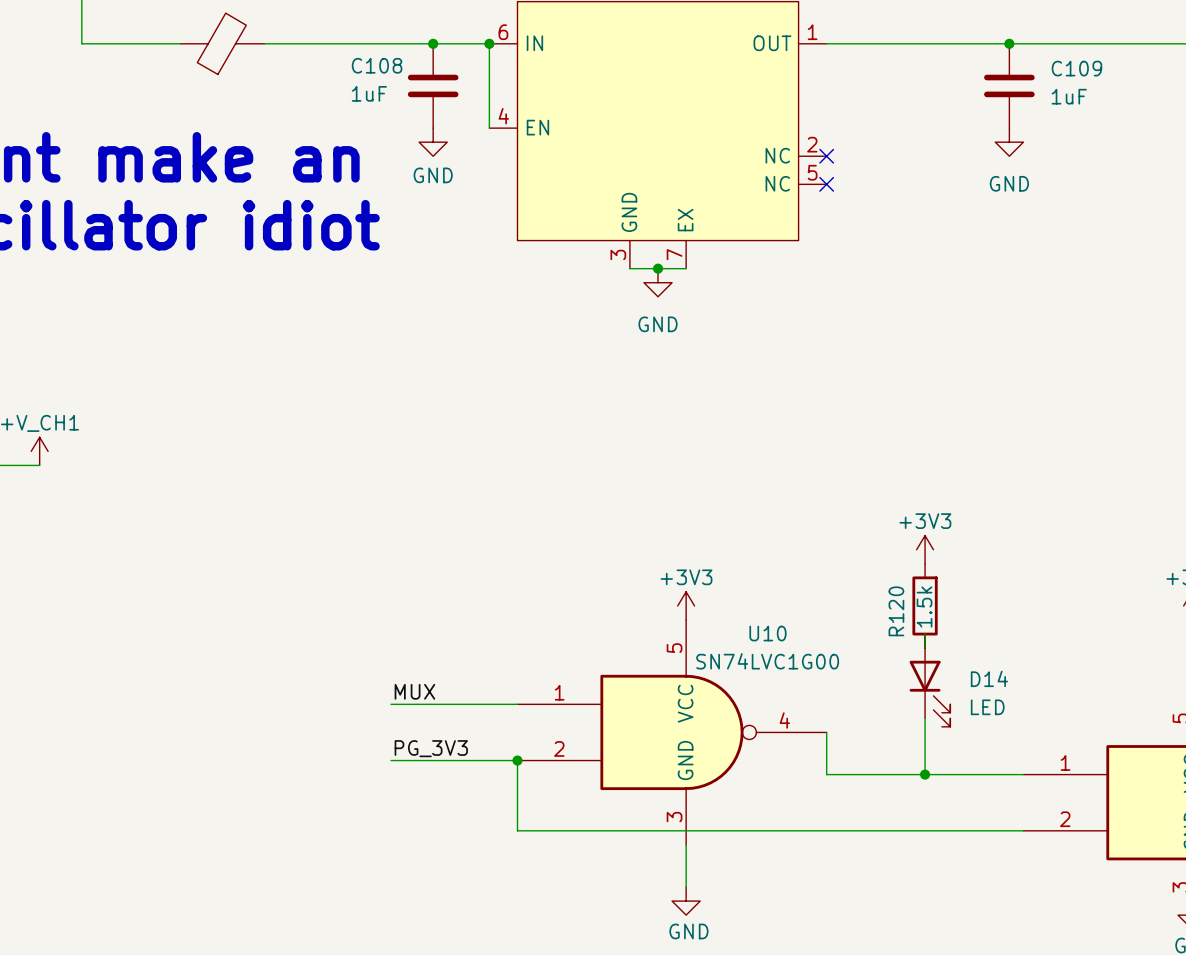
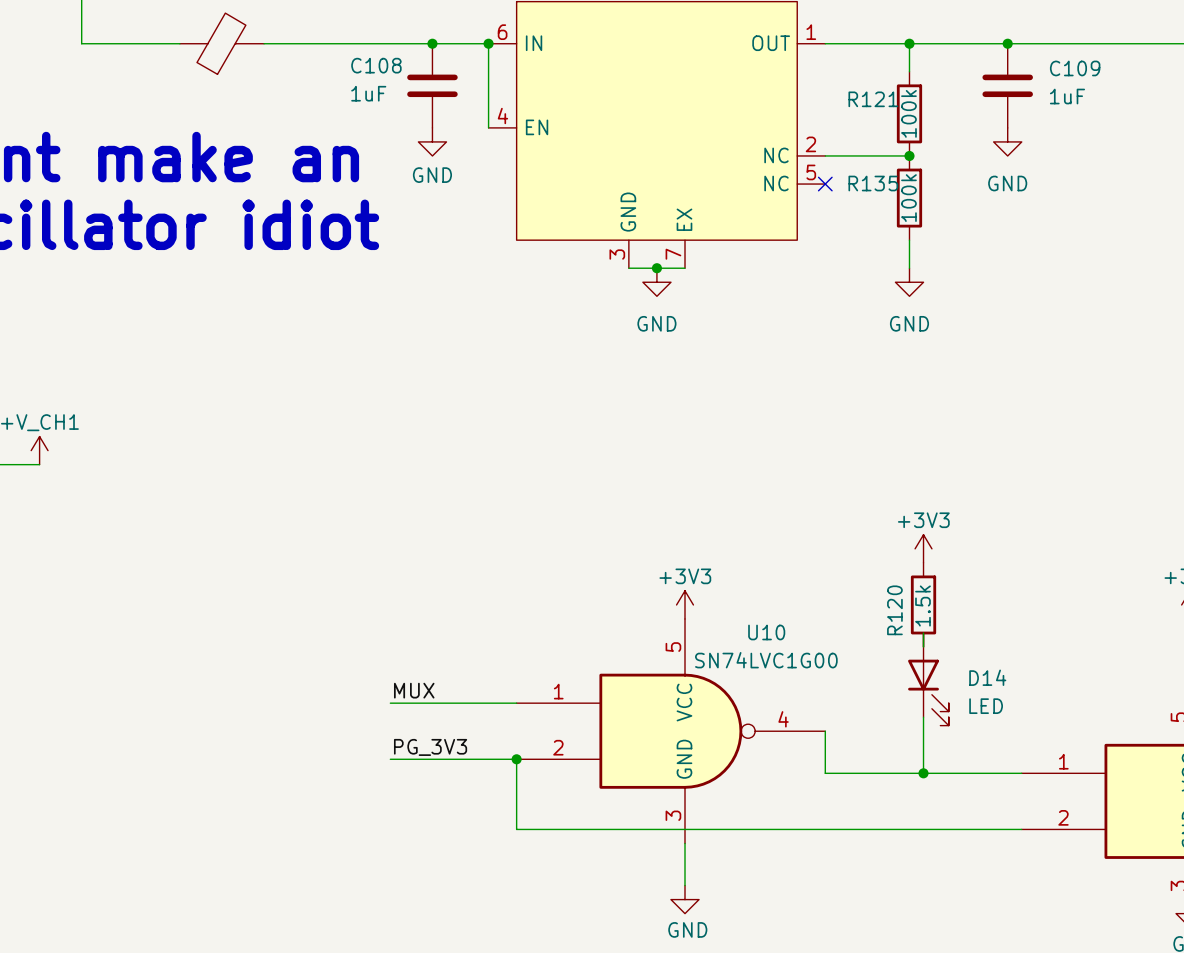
wire: none -> (909, 43) (909, 71)
junction: none -> (909, 43)
R121: none -> 100k (909, 113)
wire: none -> (825, 155) (909, 155)
no-connect mark: (826, 156) -> none
junction: none -> (909, 155)
R135: none -> 100k (909, 198)
wire: none -> (909, 240) (909, 268)
power symbol: none -> GND (909, 282)

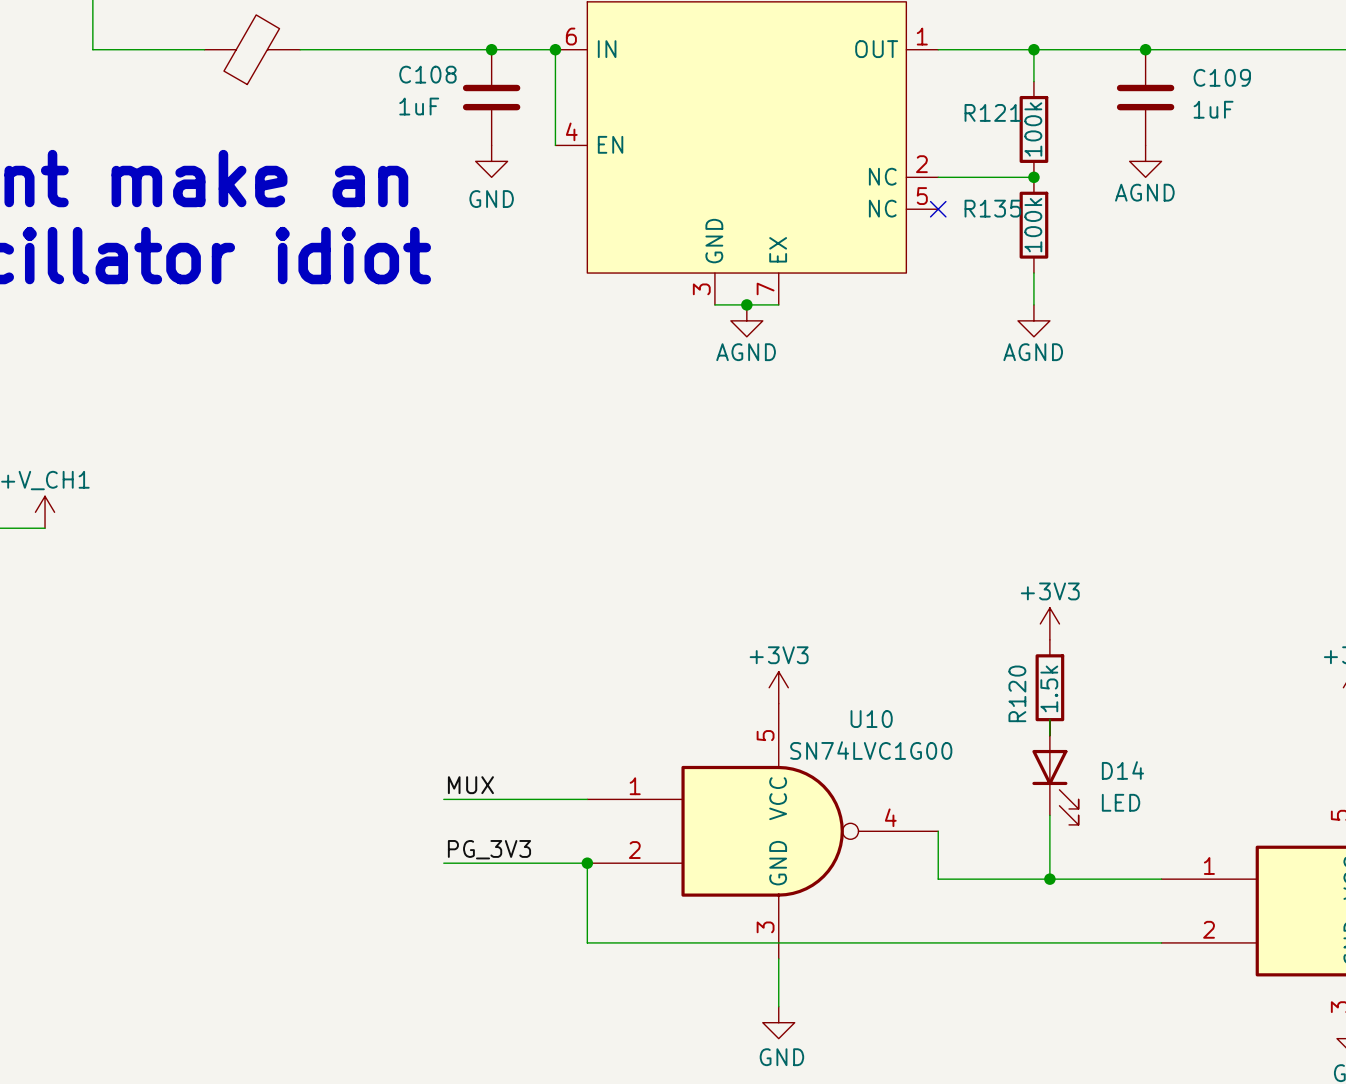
power symbol: GND (1007, 141) -> AGND (1145, 161)
power symbol: GND (656, 282) -> AGND (746, 320)
power symbol: GND (909, 282) -> AGND (1033, 320)

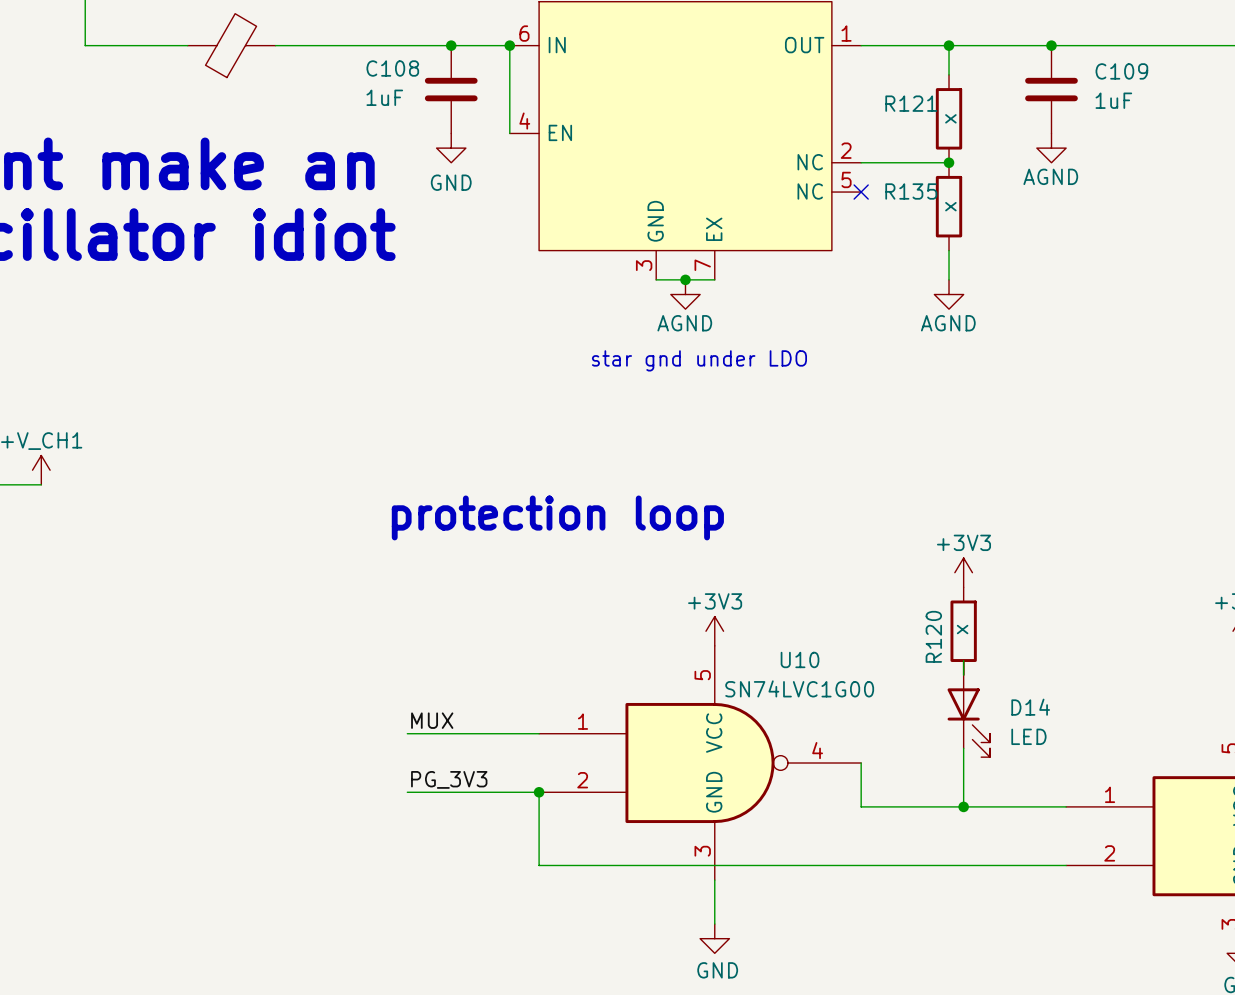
R121 value: 100k (1033, 129) -> x (950, 118)
R135 value: 100k (1033, 225) -> x (950, 206)
text: none -> star gnd under LDO (699, 360)
text: none -> protection loop (557, 517)
R120 value: 1.5k (1049, 688) -> x (962, 629)

